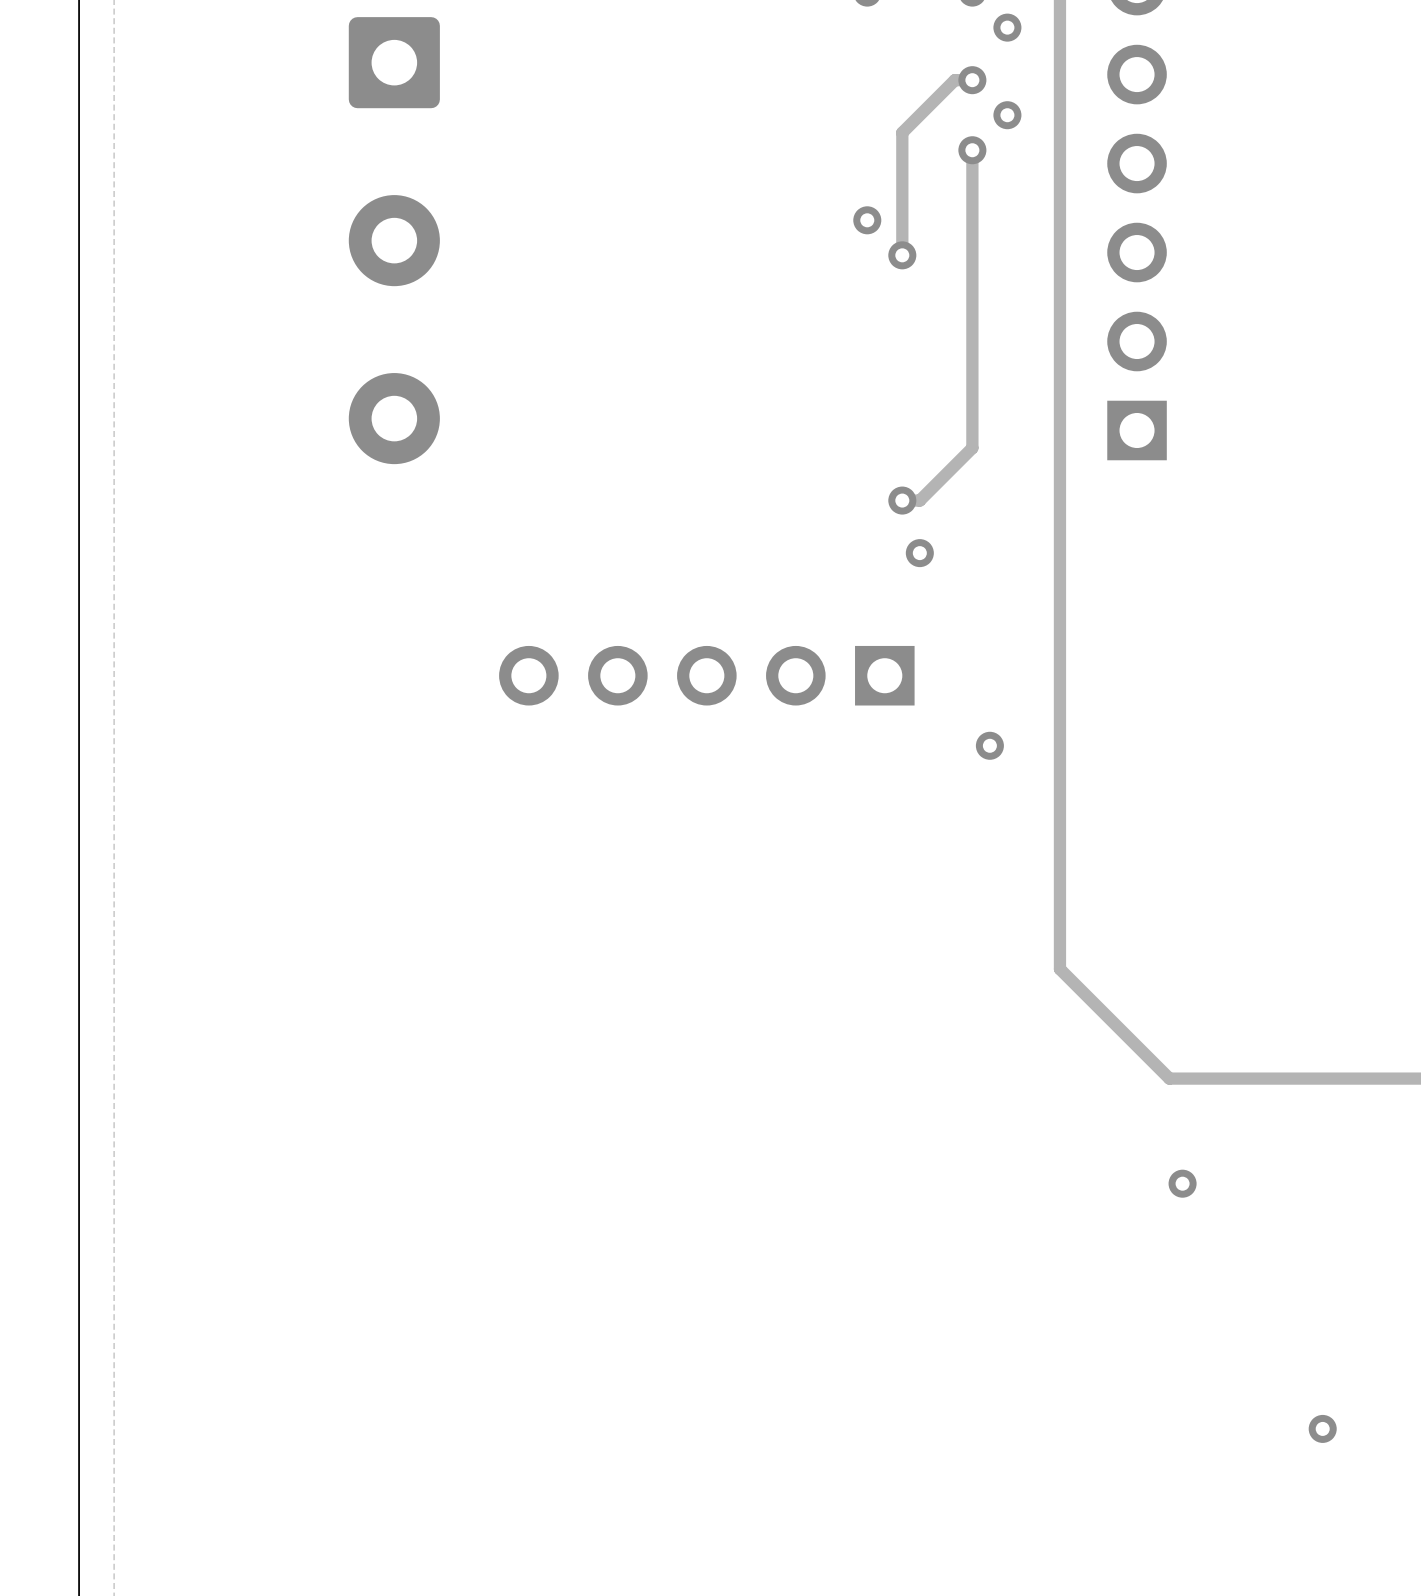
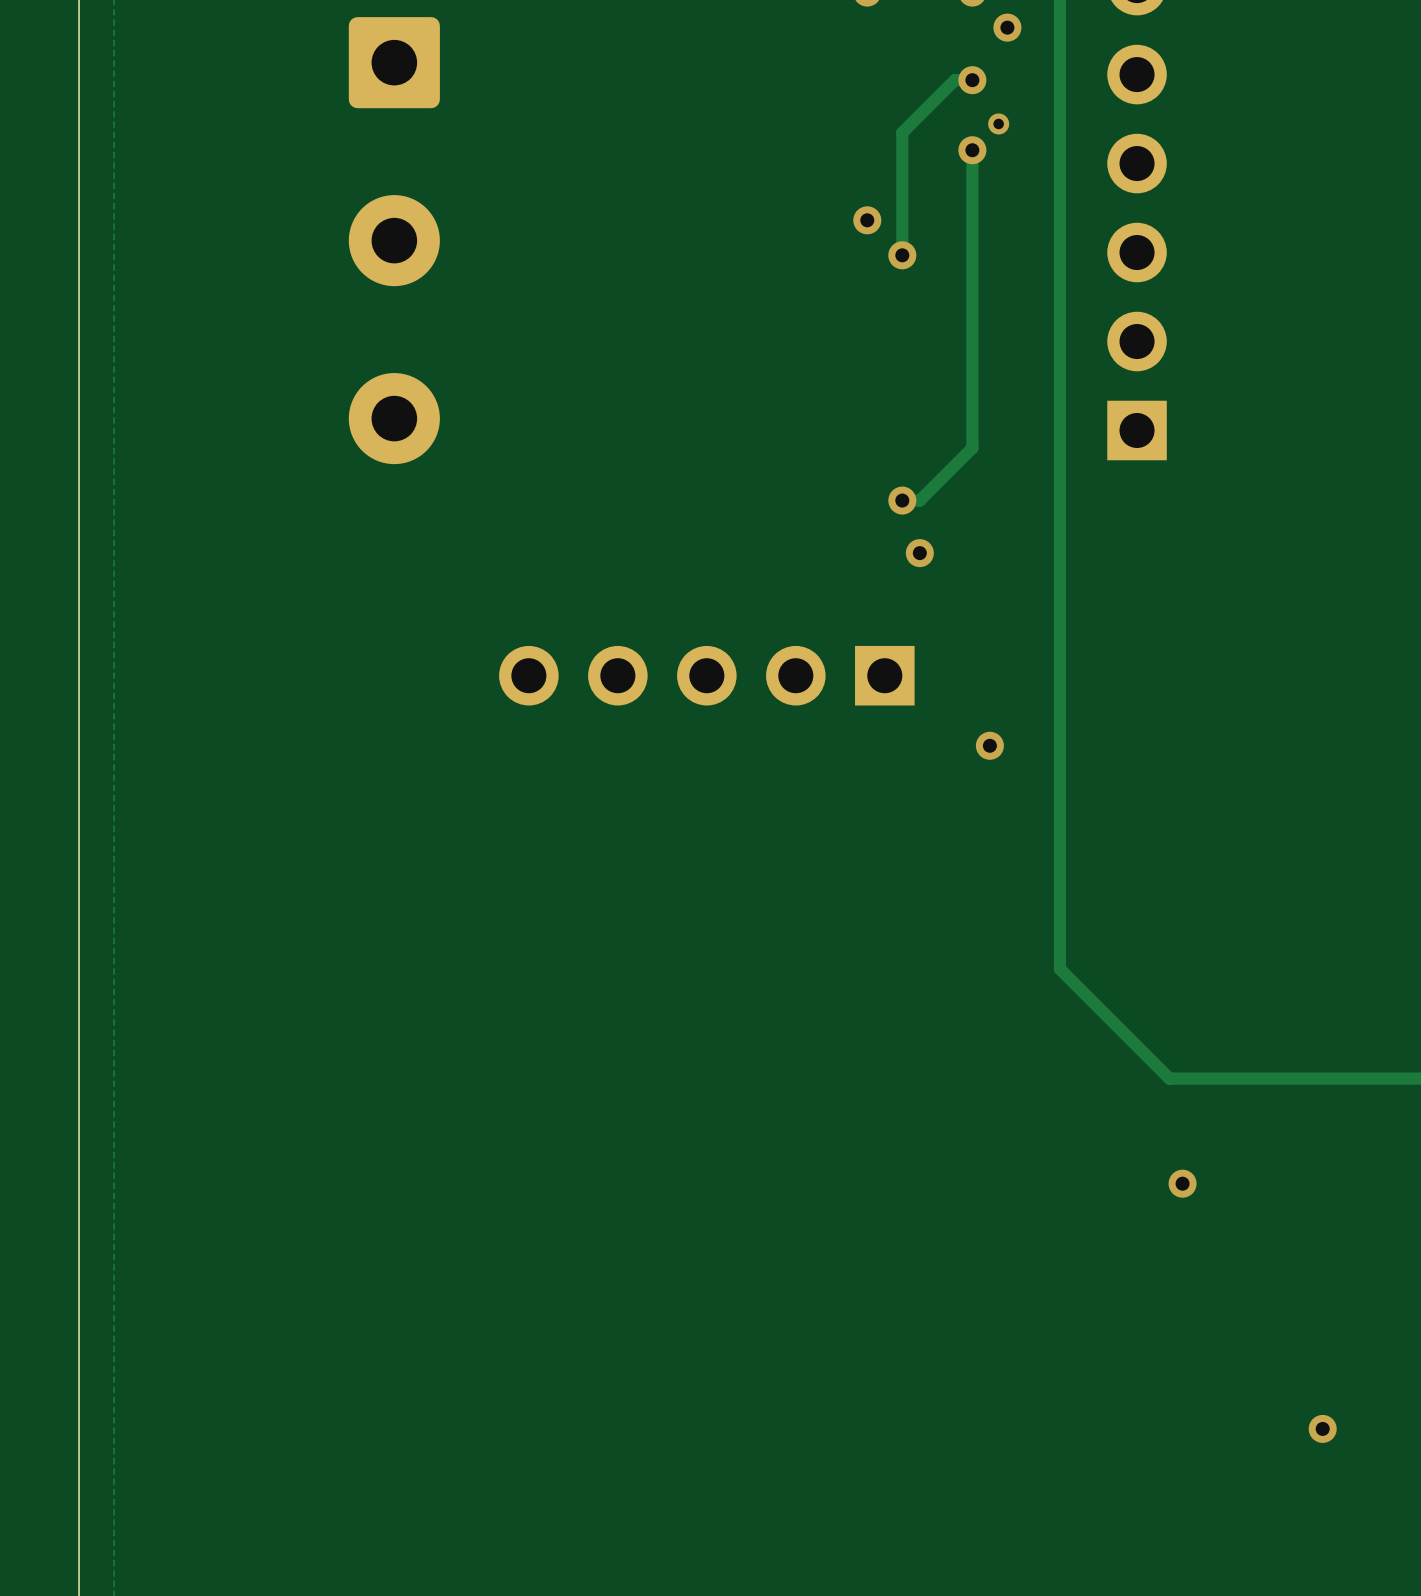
via size: [993, 101, 1022, 130] -> [988, 113, 1010, 135]

